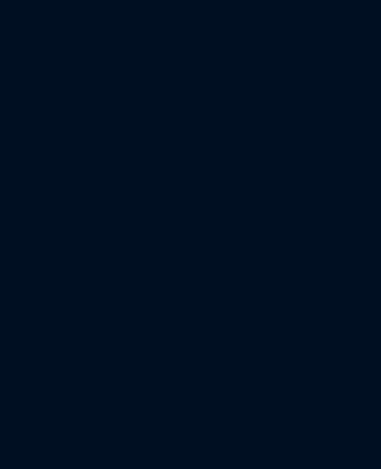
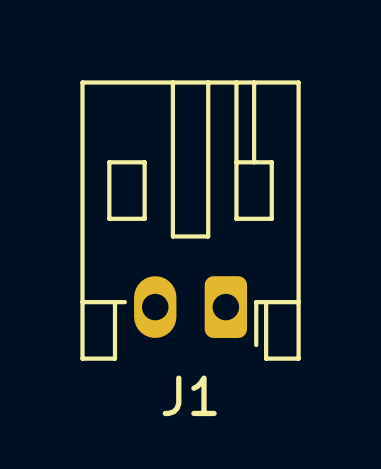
J1: none -> (190, 220)

